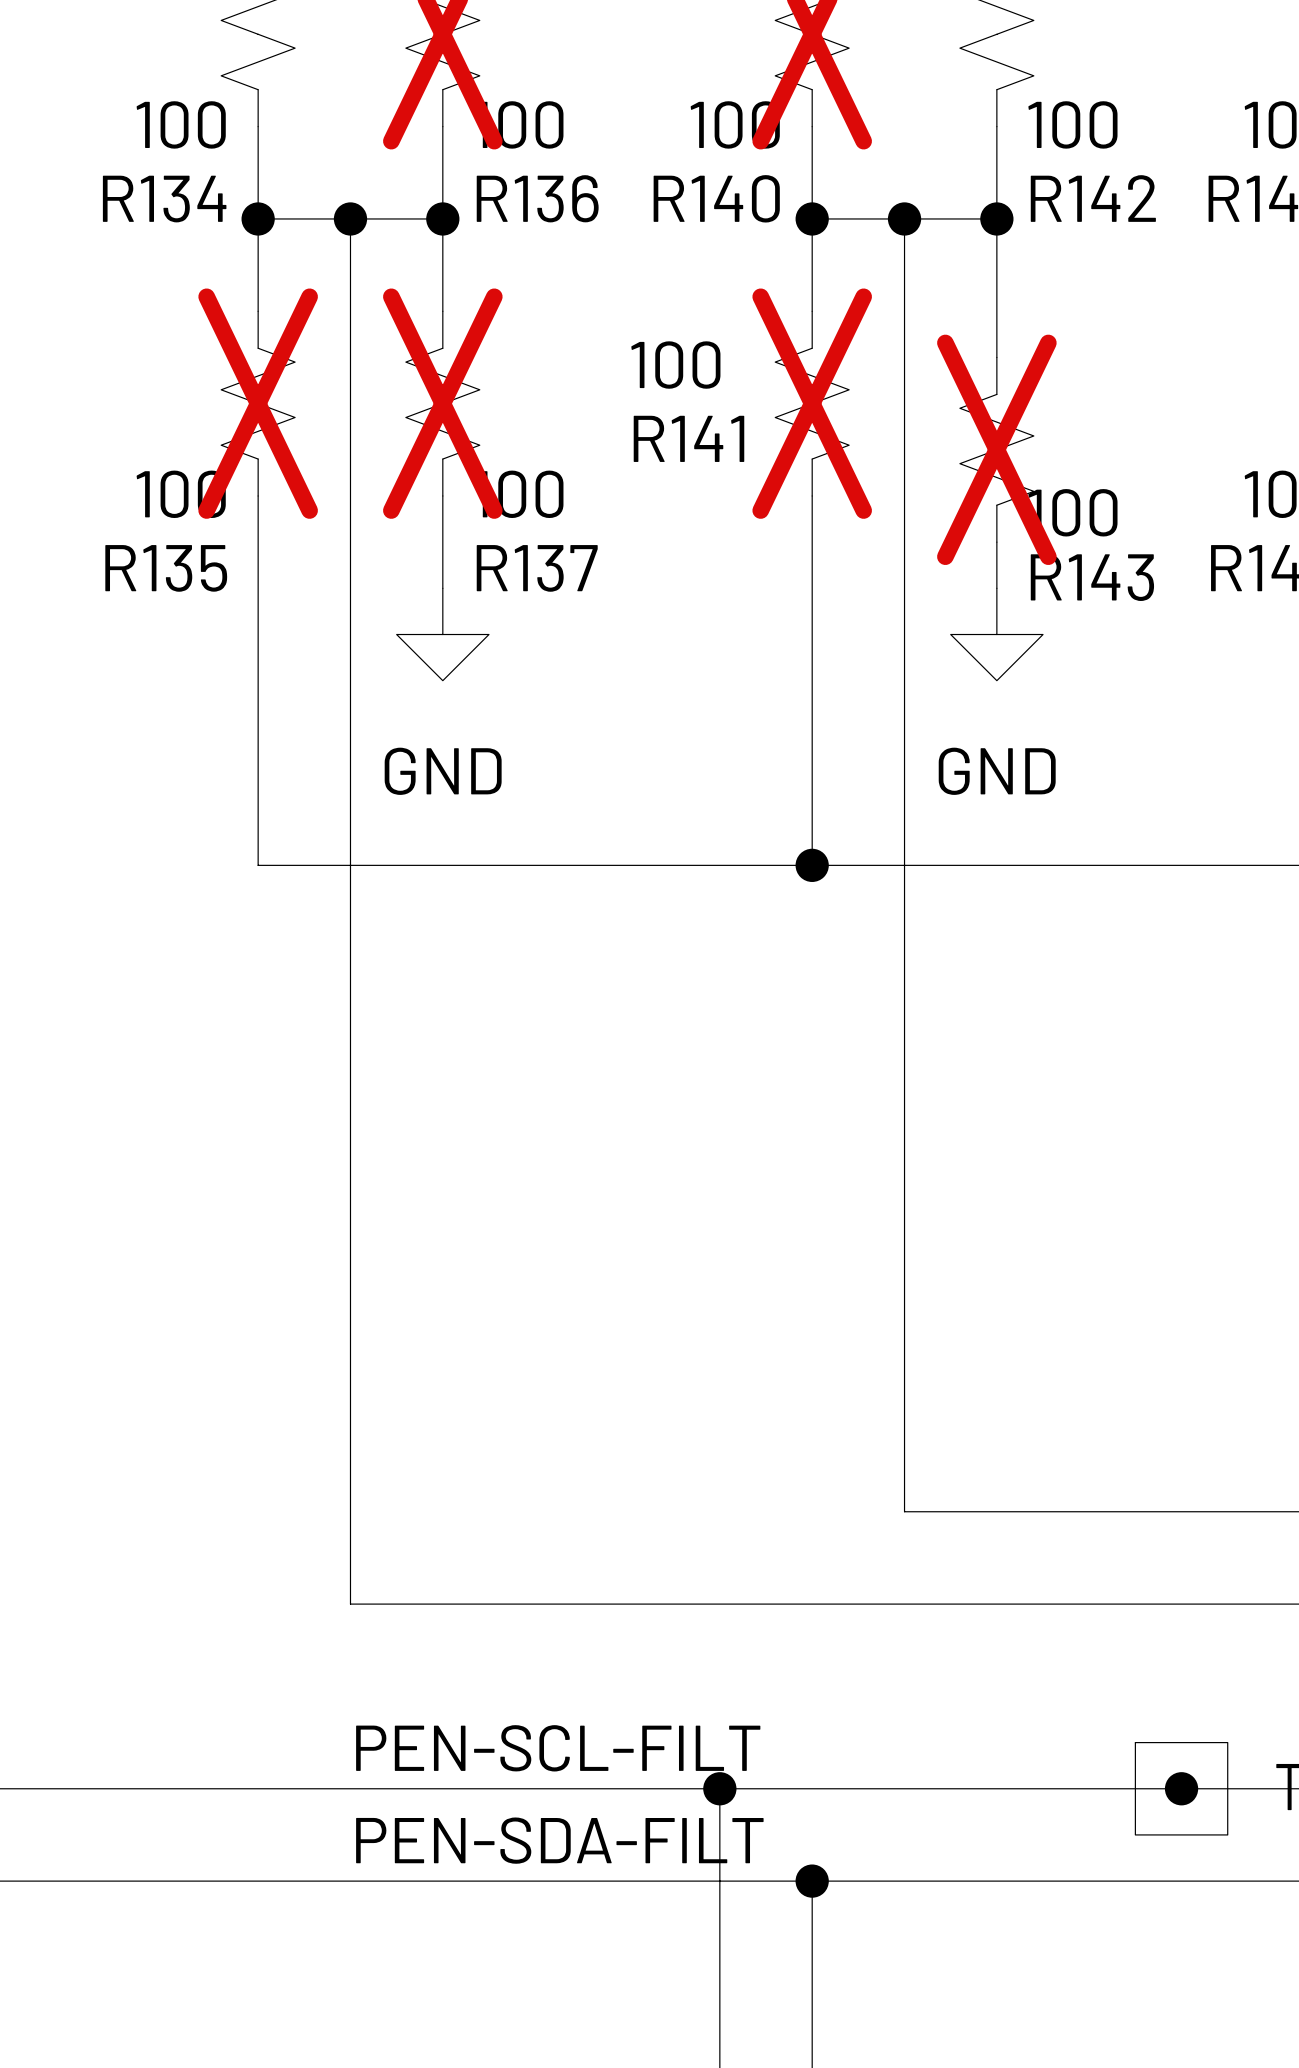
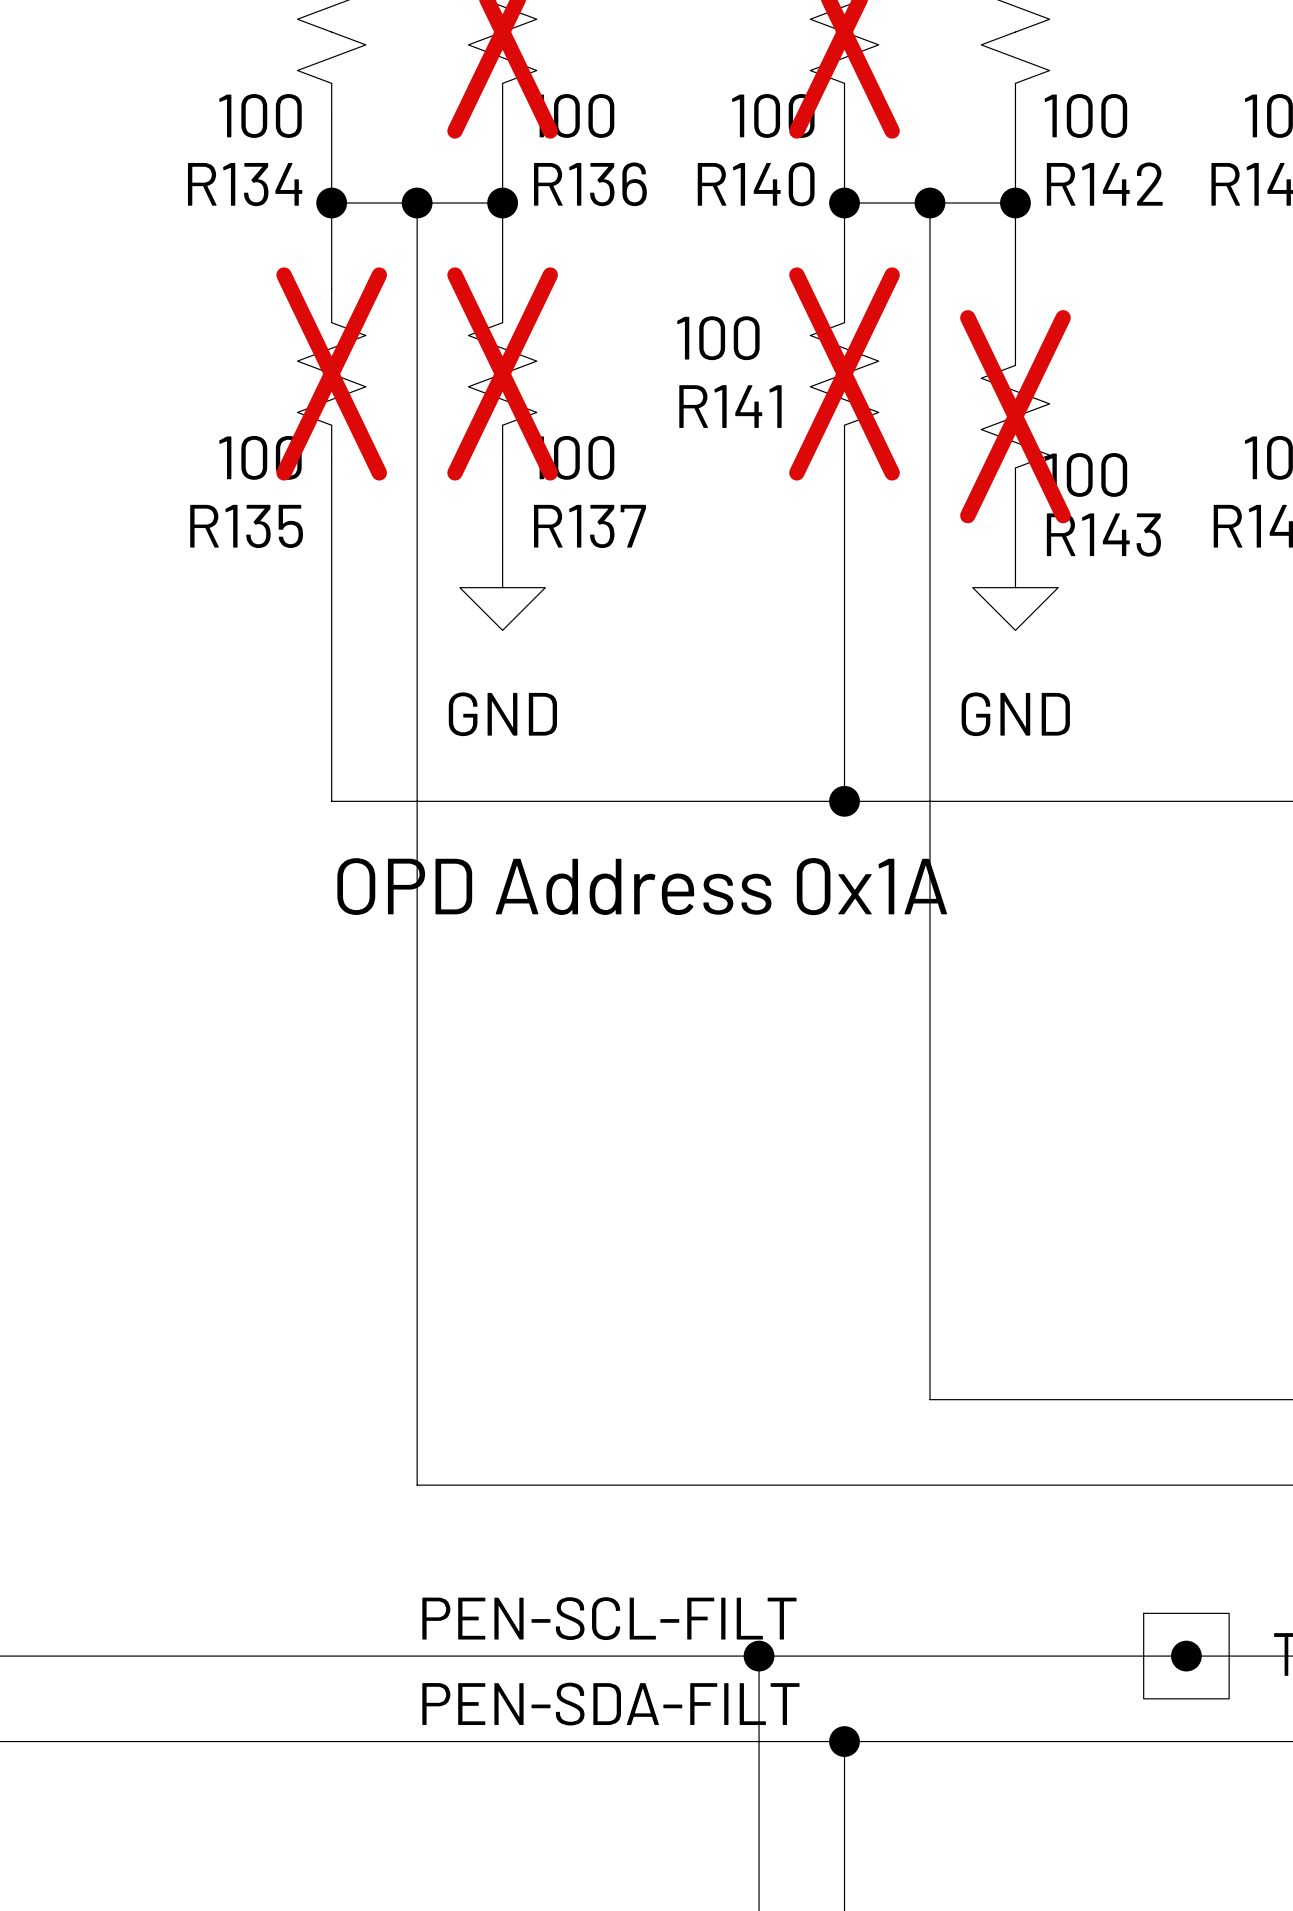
text: none -> OPD Address 0x1A (642, 886)

